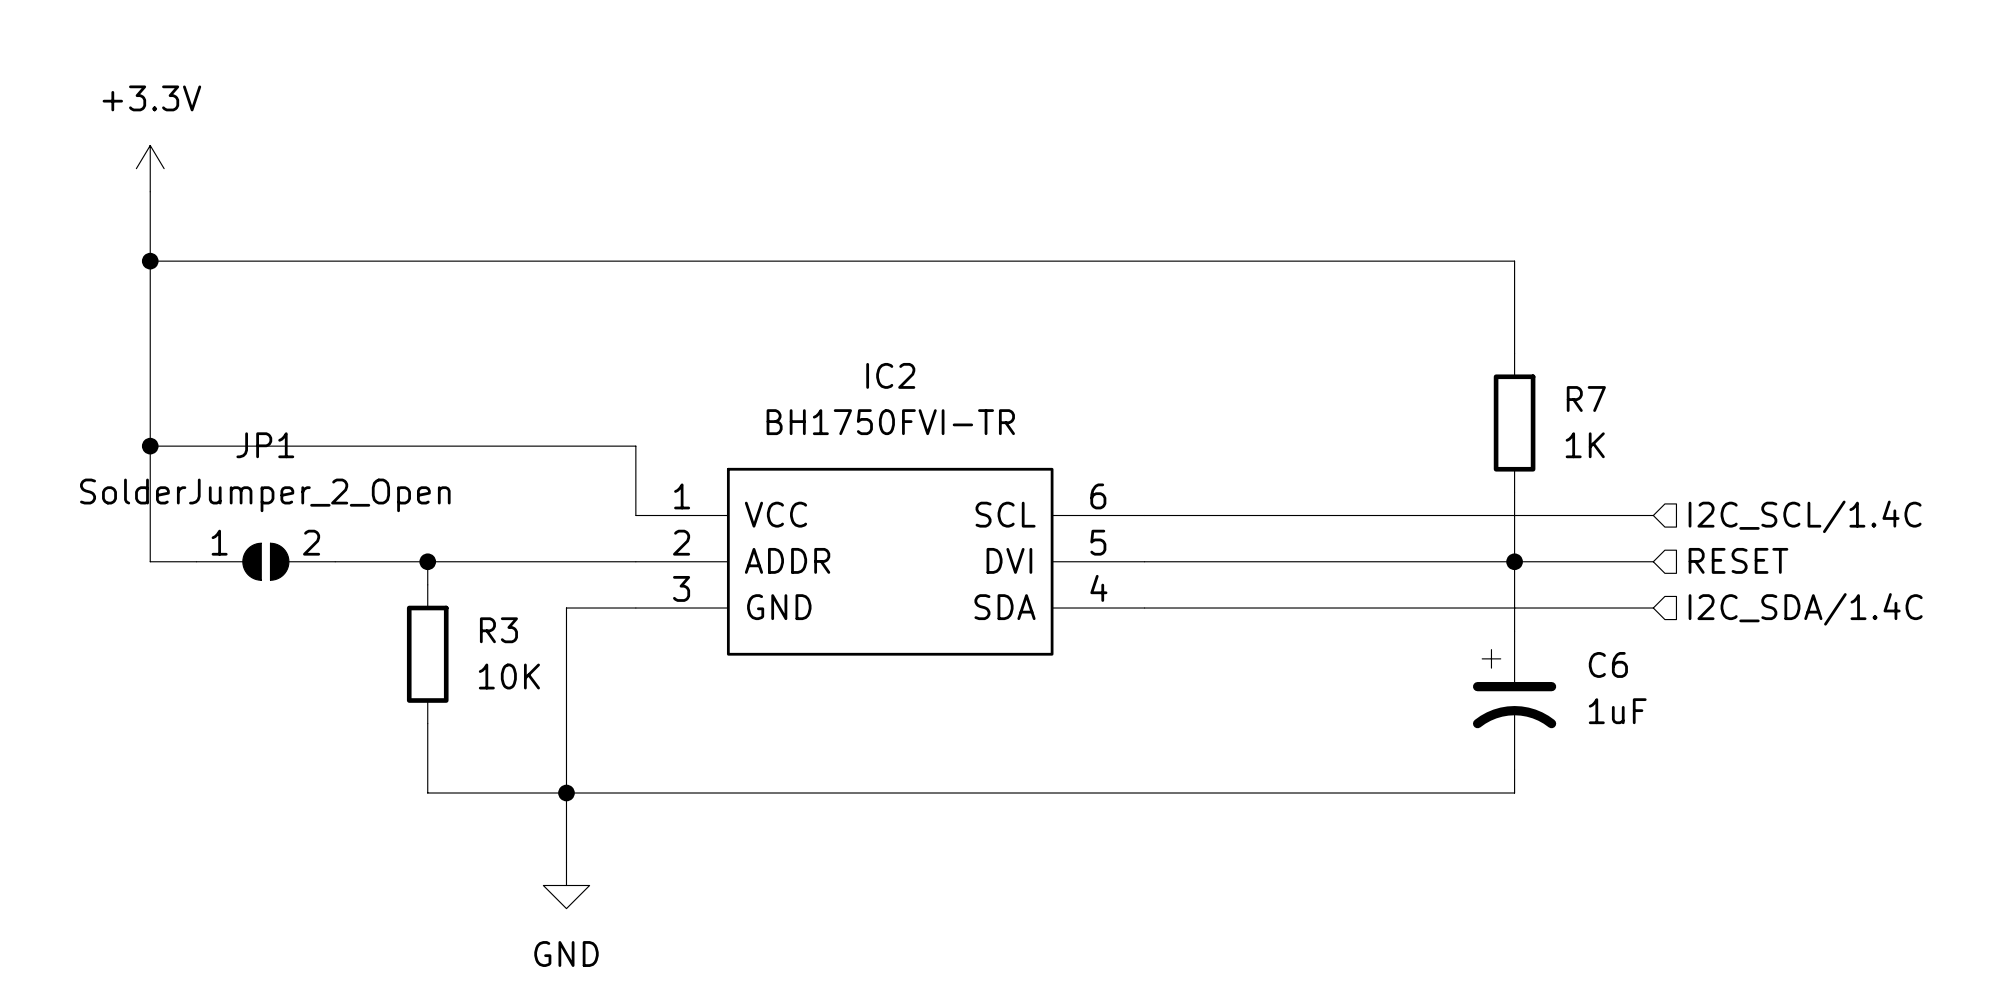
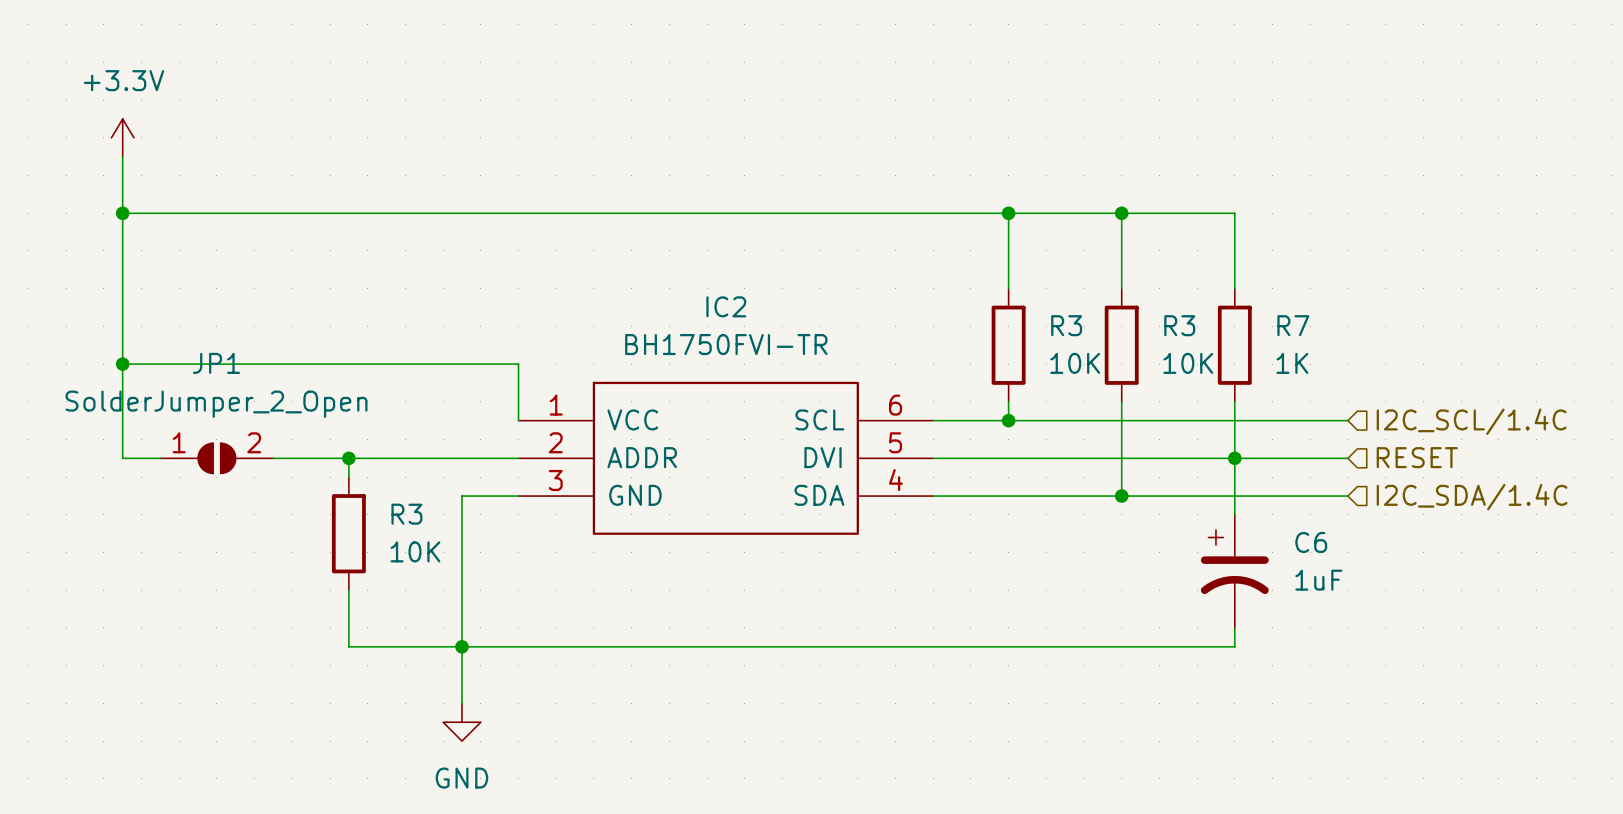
wire: none -> (1008, 213) (1008, 288)
junction: none -> (1008, 213)
wire: none -> (1121, 213) (1121, 288)
junction: none -> (1121, 213)
R3: none -> 10K (1008, 345)
R3: none -> 10K (1121, 345)
wire: none -> (1008, 401) (1008, 420)
wire: none -> (1121, 401) (1121, 496)
junction: none -> (1008, 420)
junction: none -> (1121, 496)

